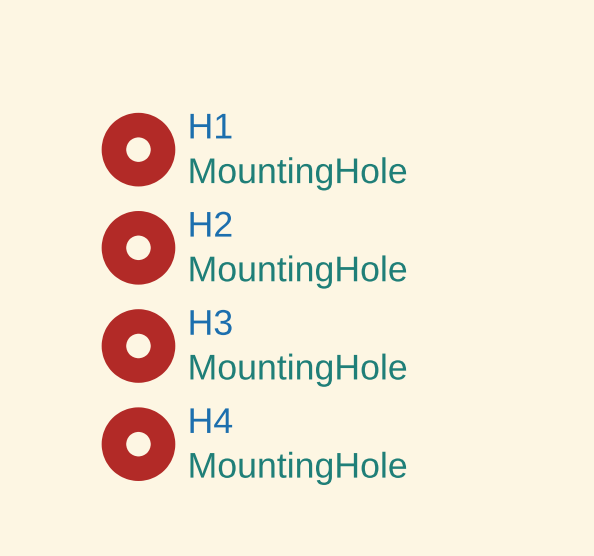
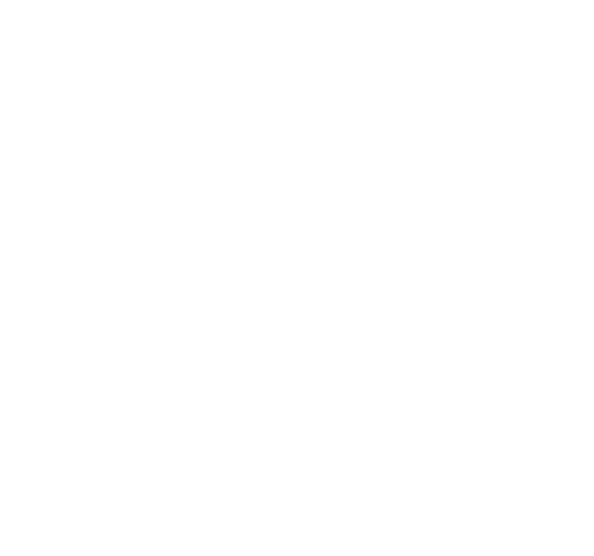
H1: MountingHole (138, 149) -> none
H2: MountingHole (138, 247) -> none
H3: MountingHole (138, 345) -> none
H4: MountingHole (138, 444) -> none

